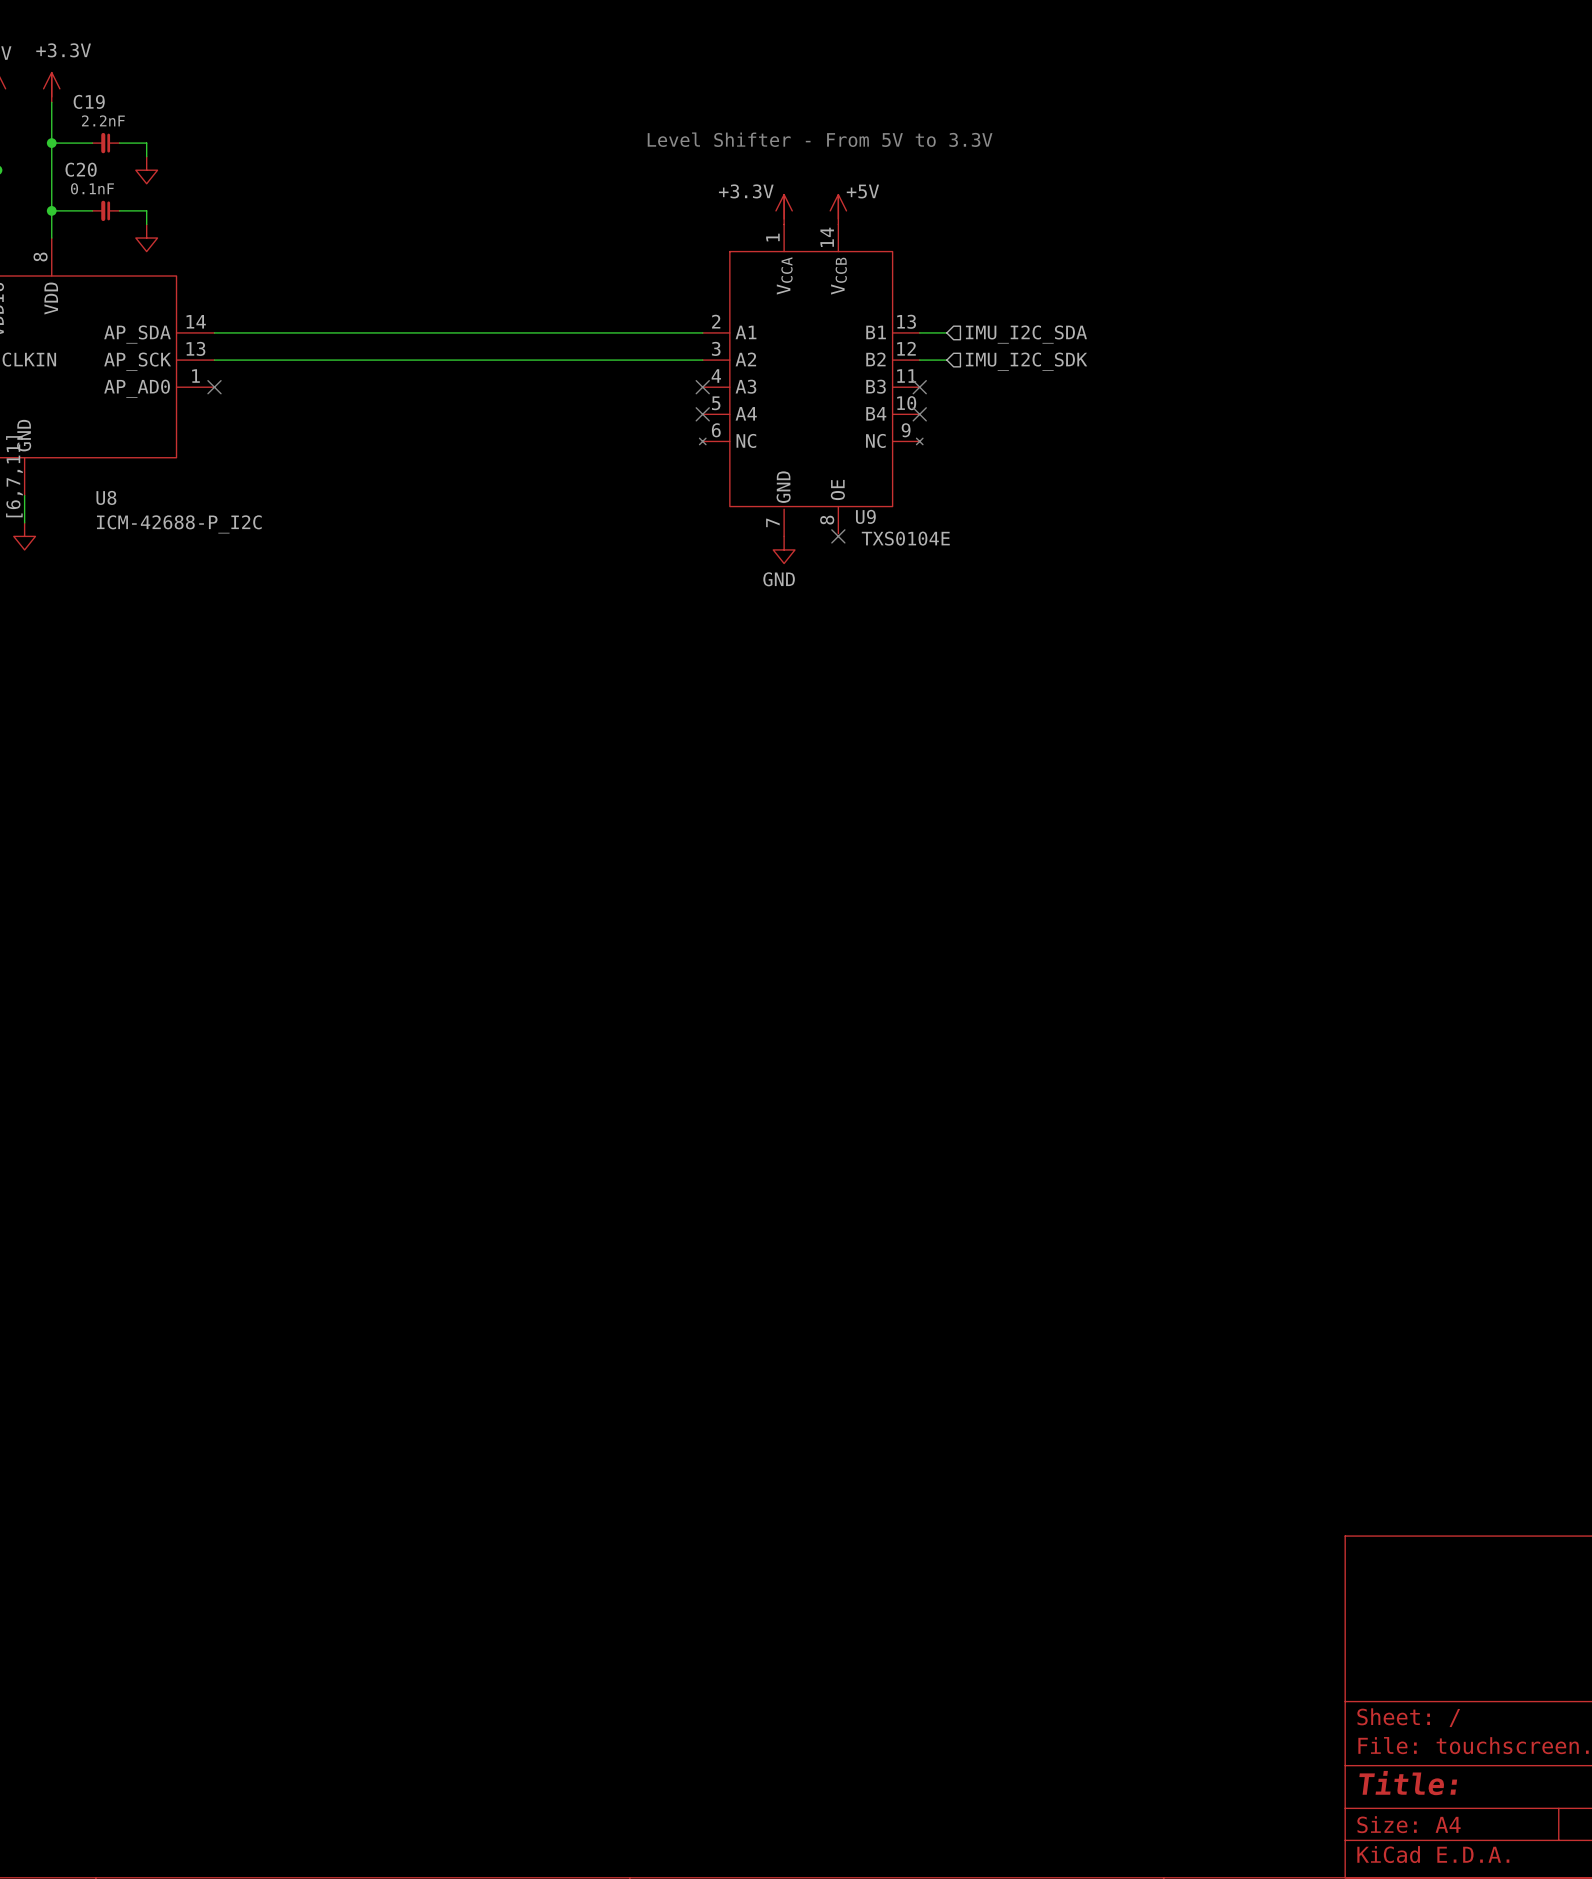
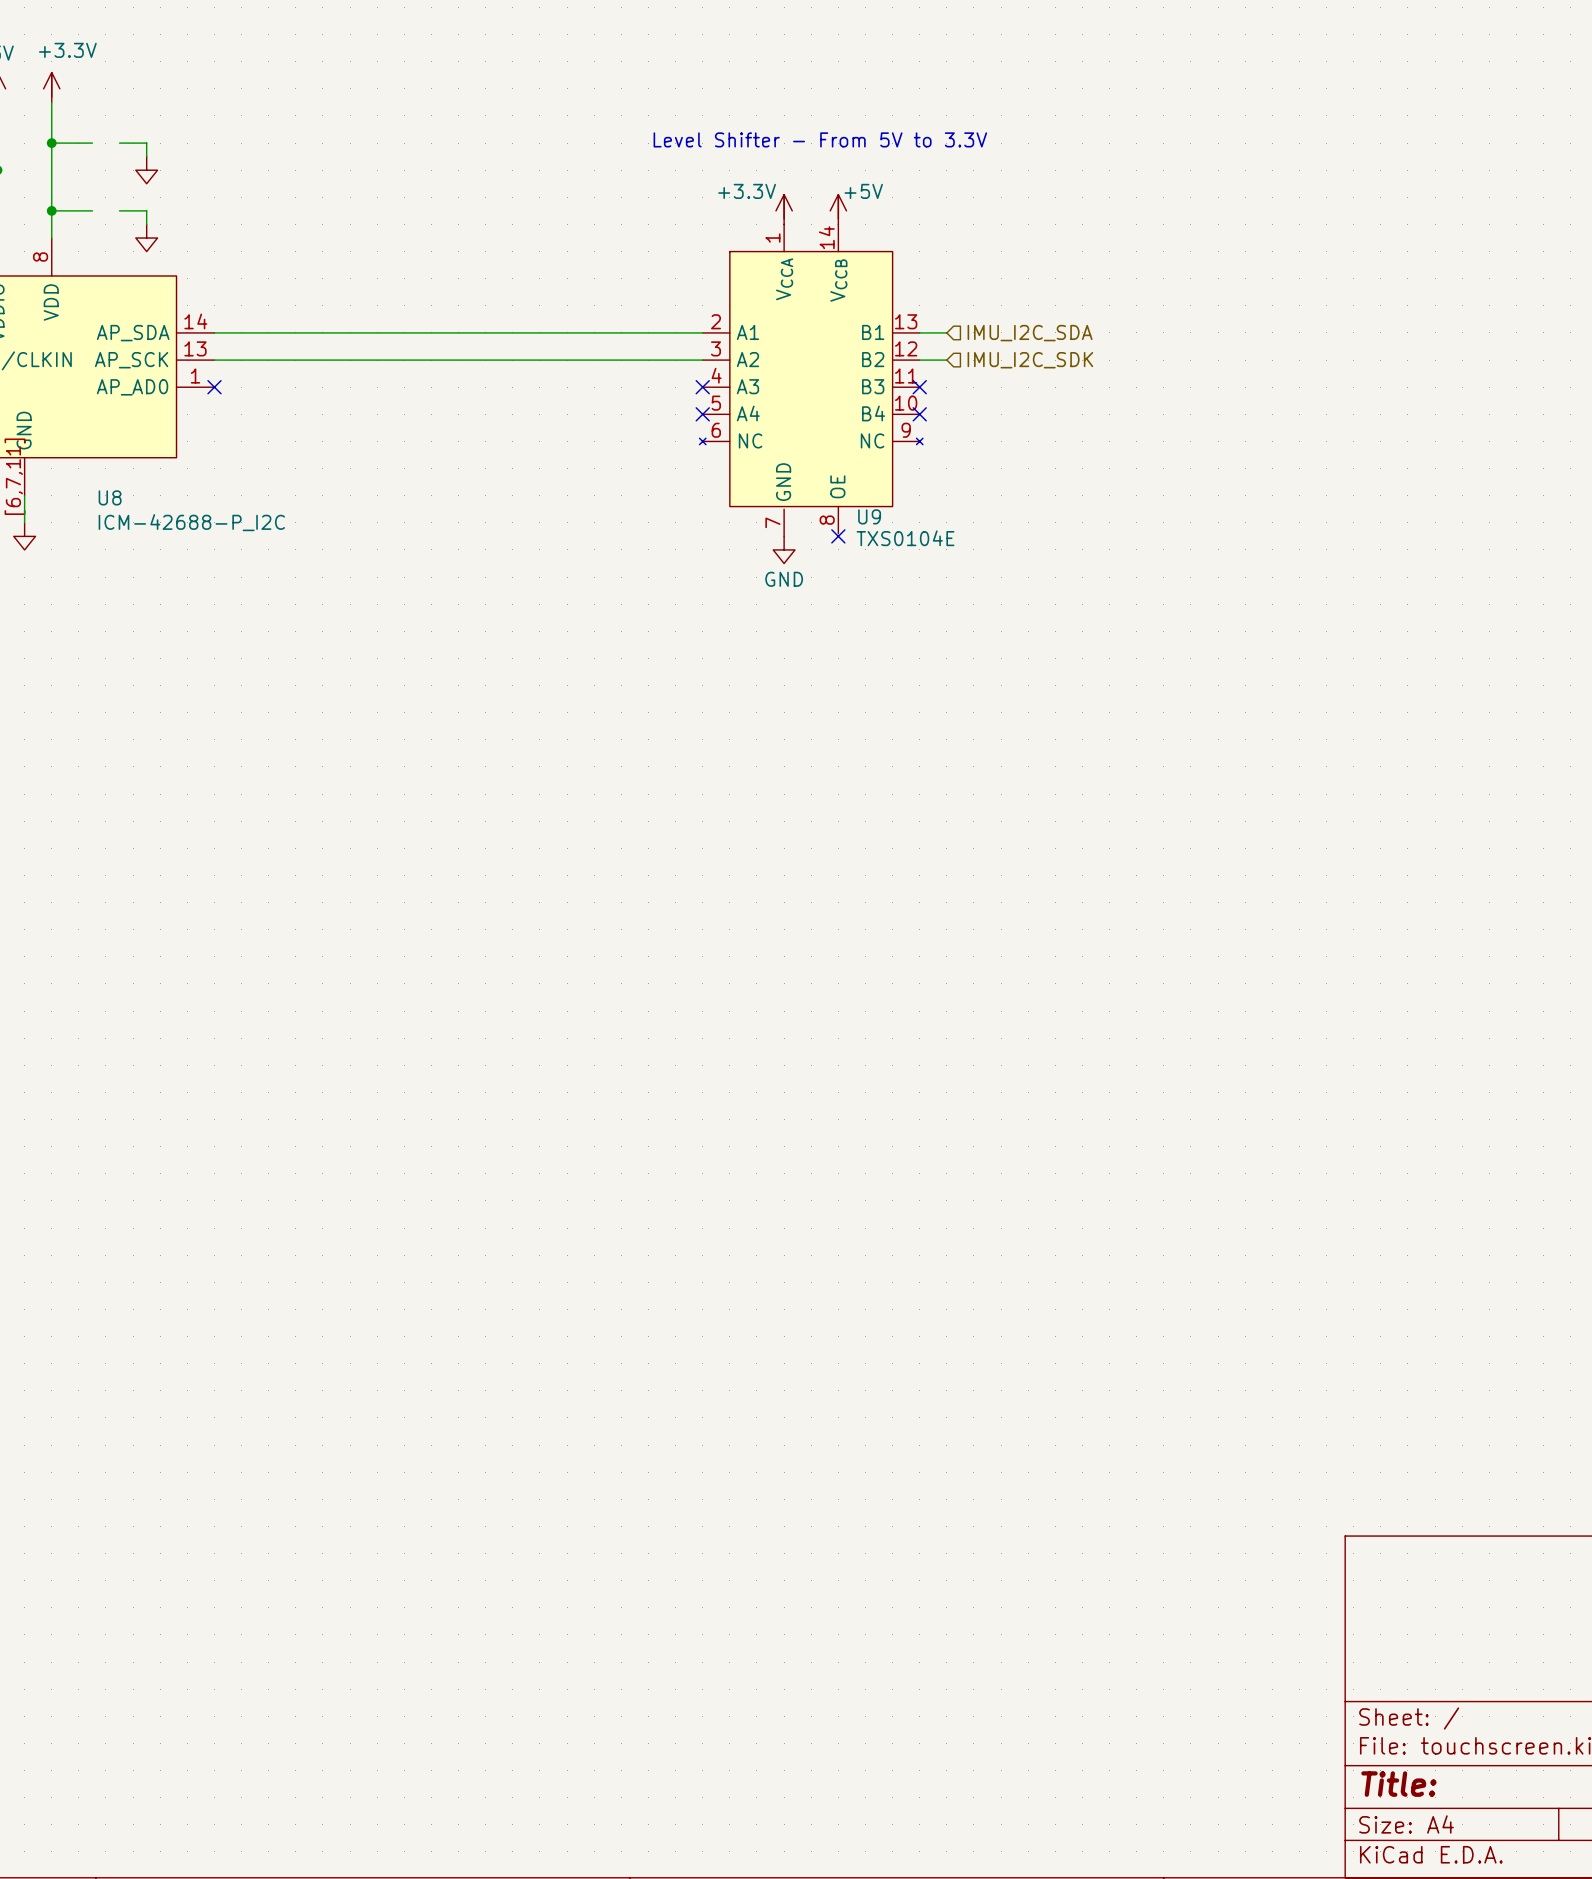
C19: 2.2nF (105, 143) -> none
C20: 0.1nF (105, 210) -> none

